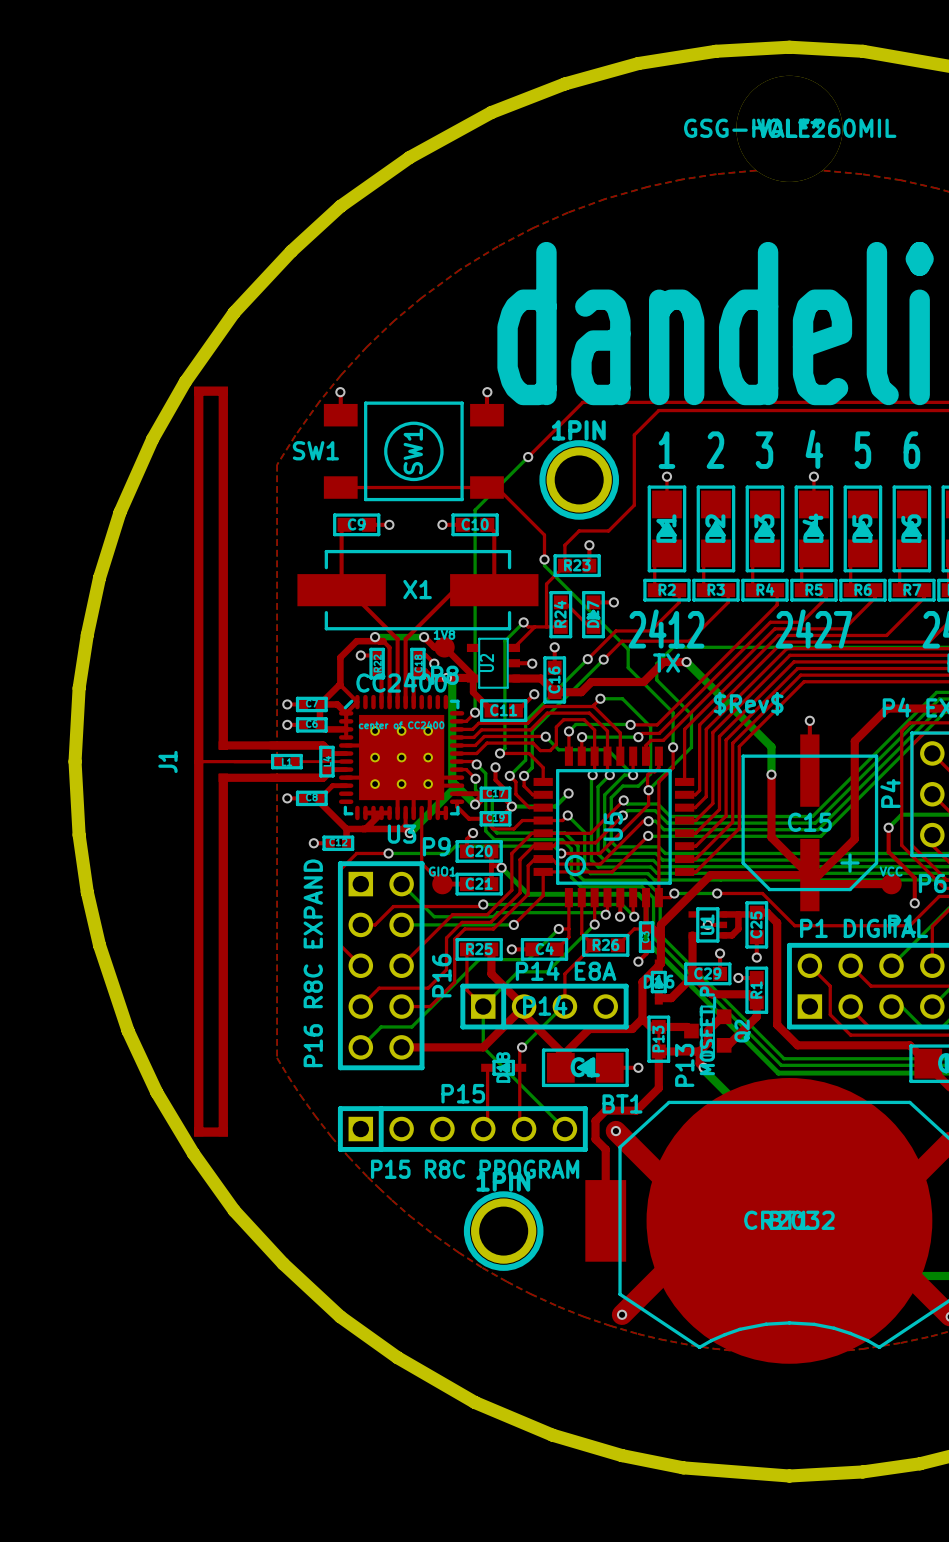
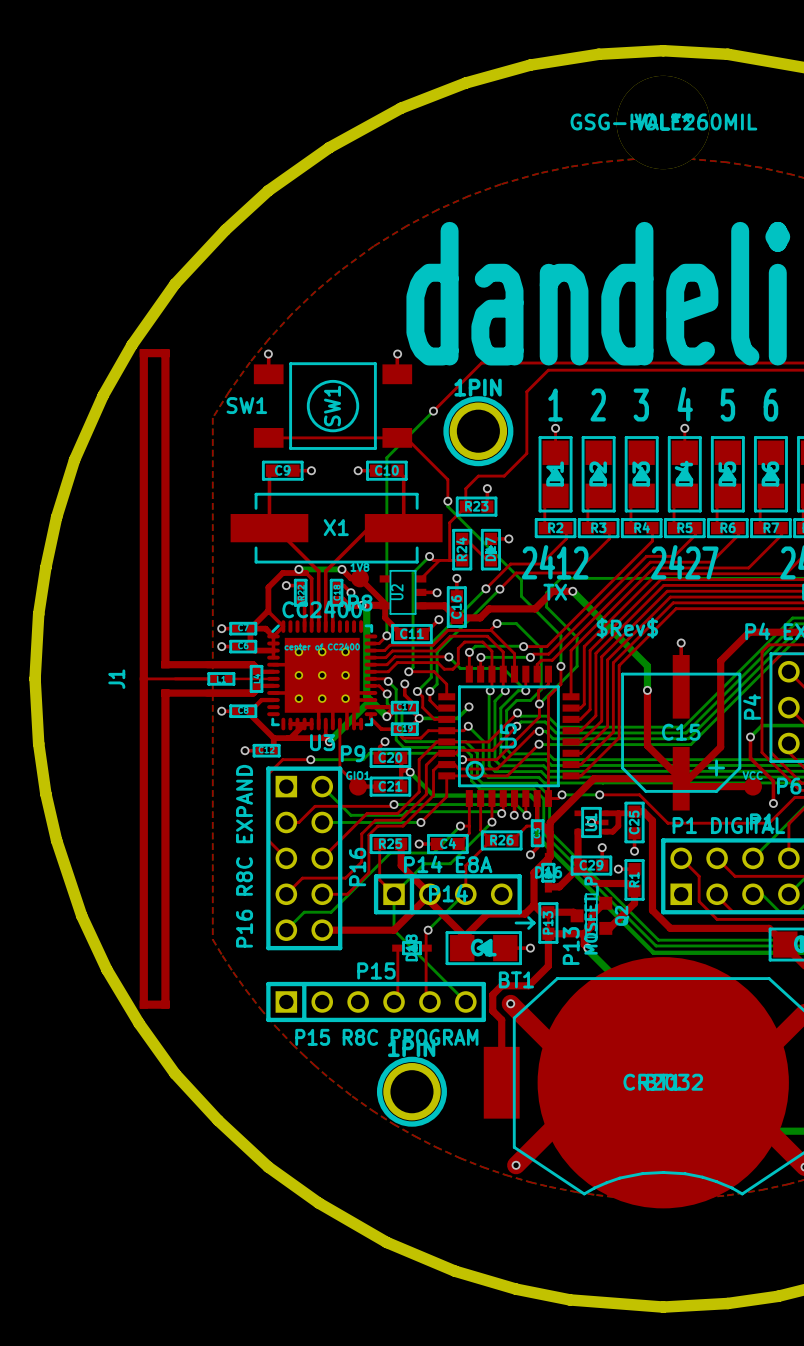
text position: P14 E8A (566, 970) -> P14 E8A (448, 864)
line: none -> (528, 917) (534, 923)
line: none -> (516, 923) (534, 923)
line: none -> (534, 923) (528, 928)

